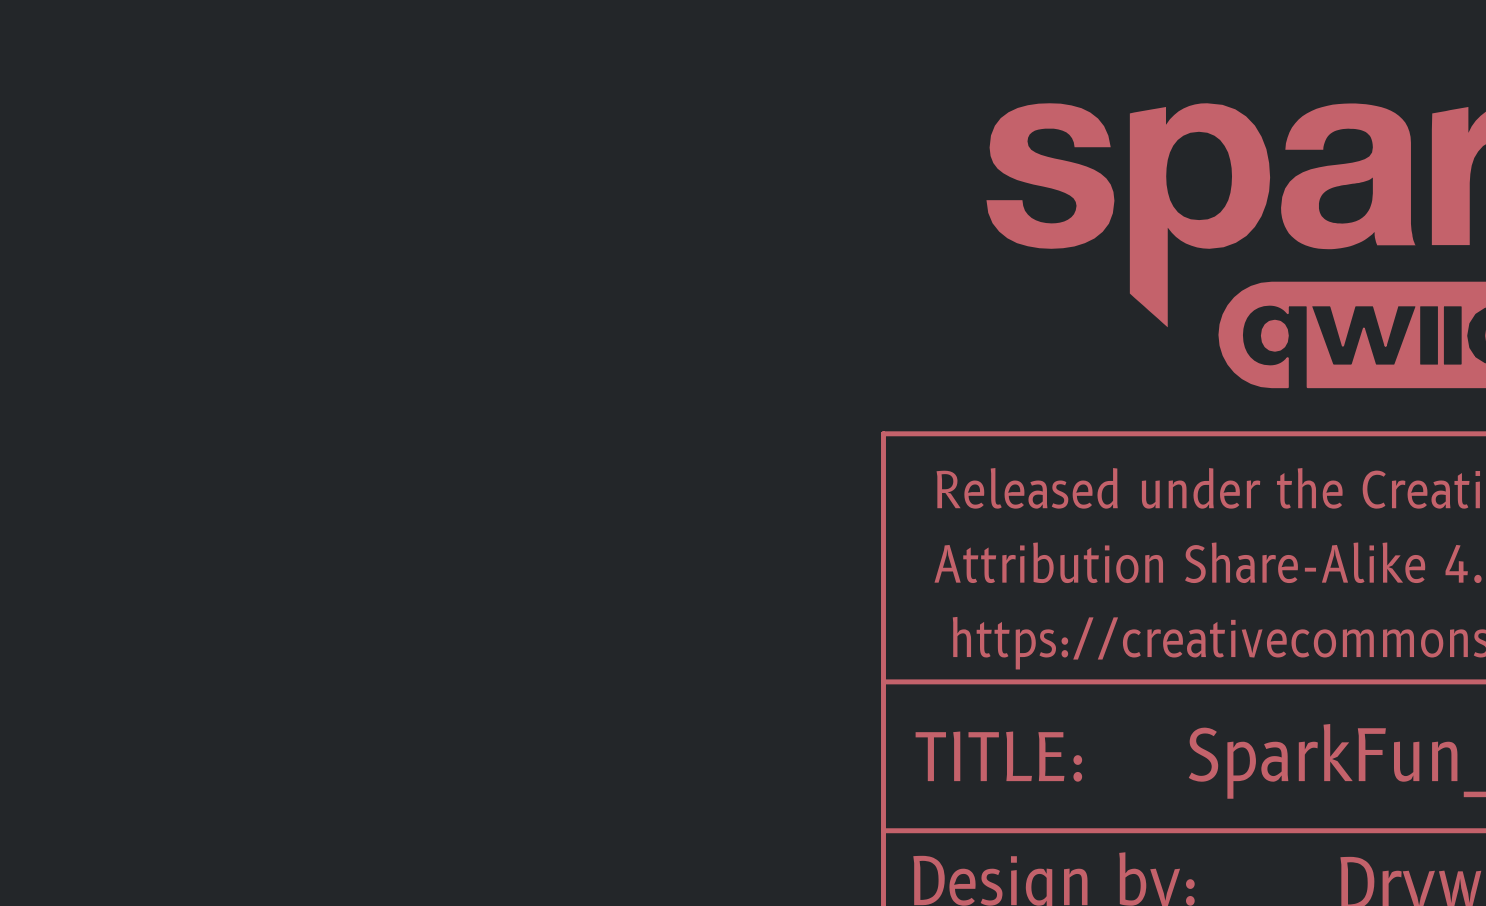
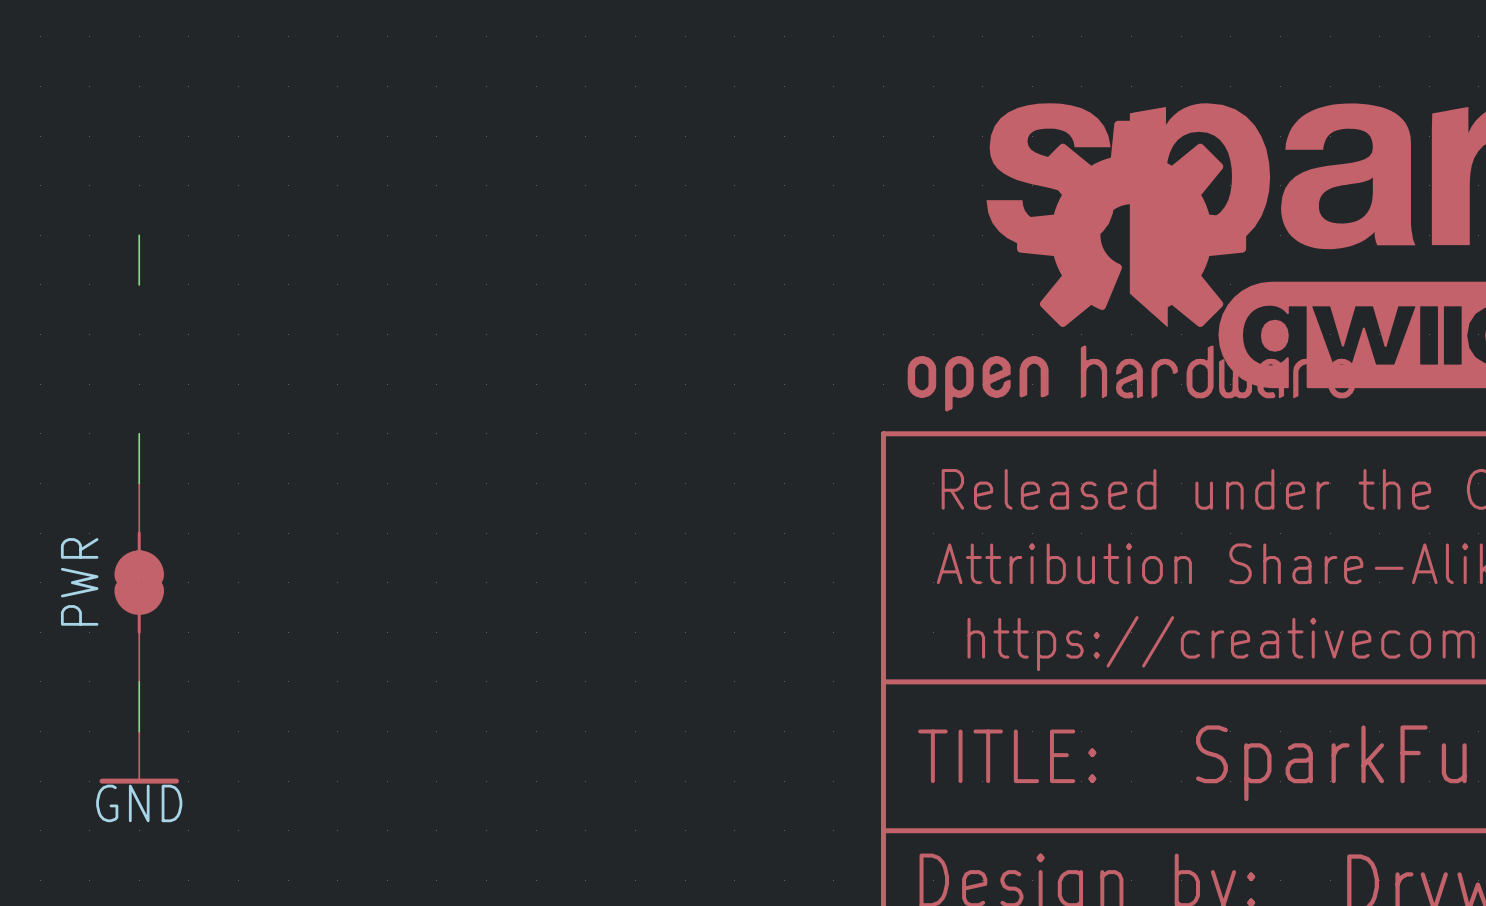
wire: none -> (139, 235) (139, 284)
part: none -> (1131, 266)
wire: none -> (139, 433) (139, 483)
PWR: none -> (139, 582)
wire: none -> (139, 681) (139, 731)
power symbol: none -> GND (139, 757)

